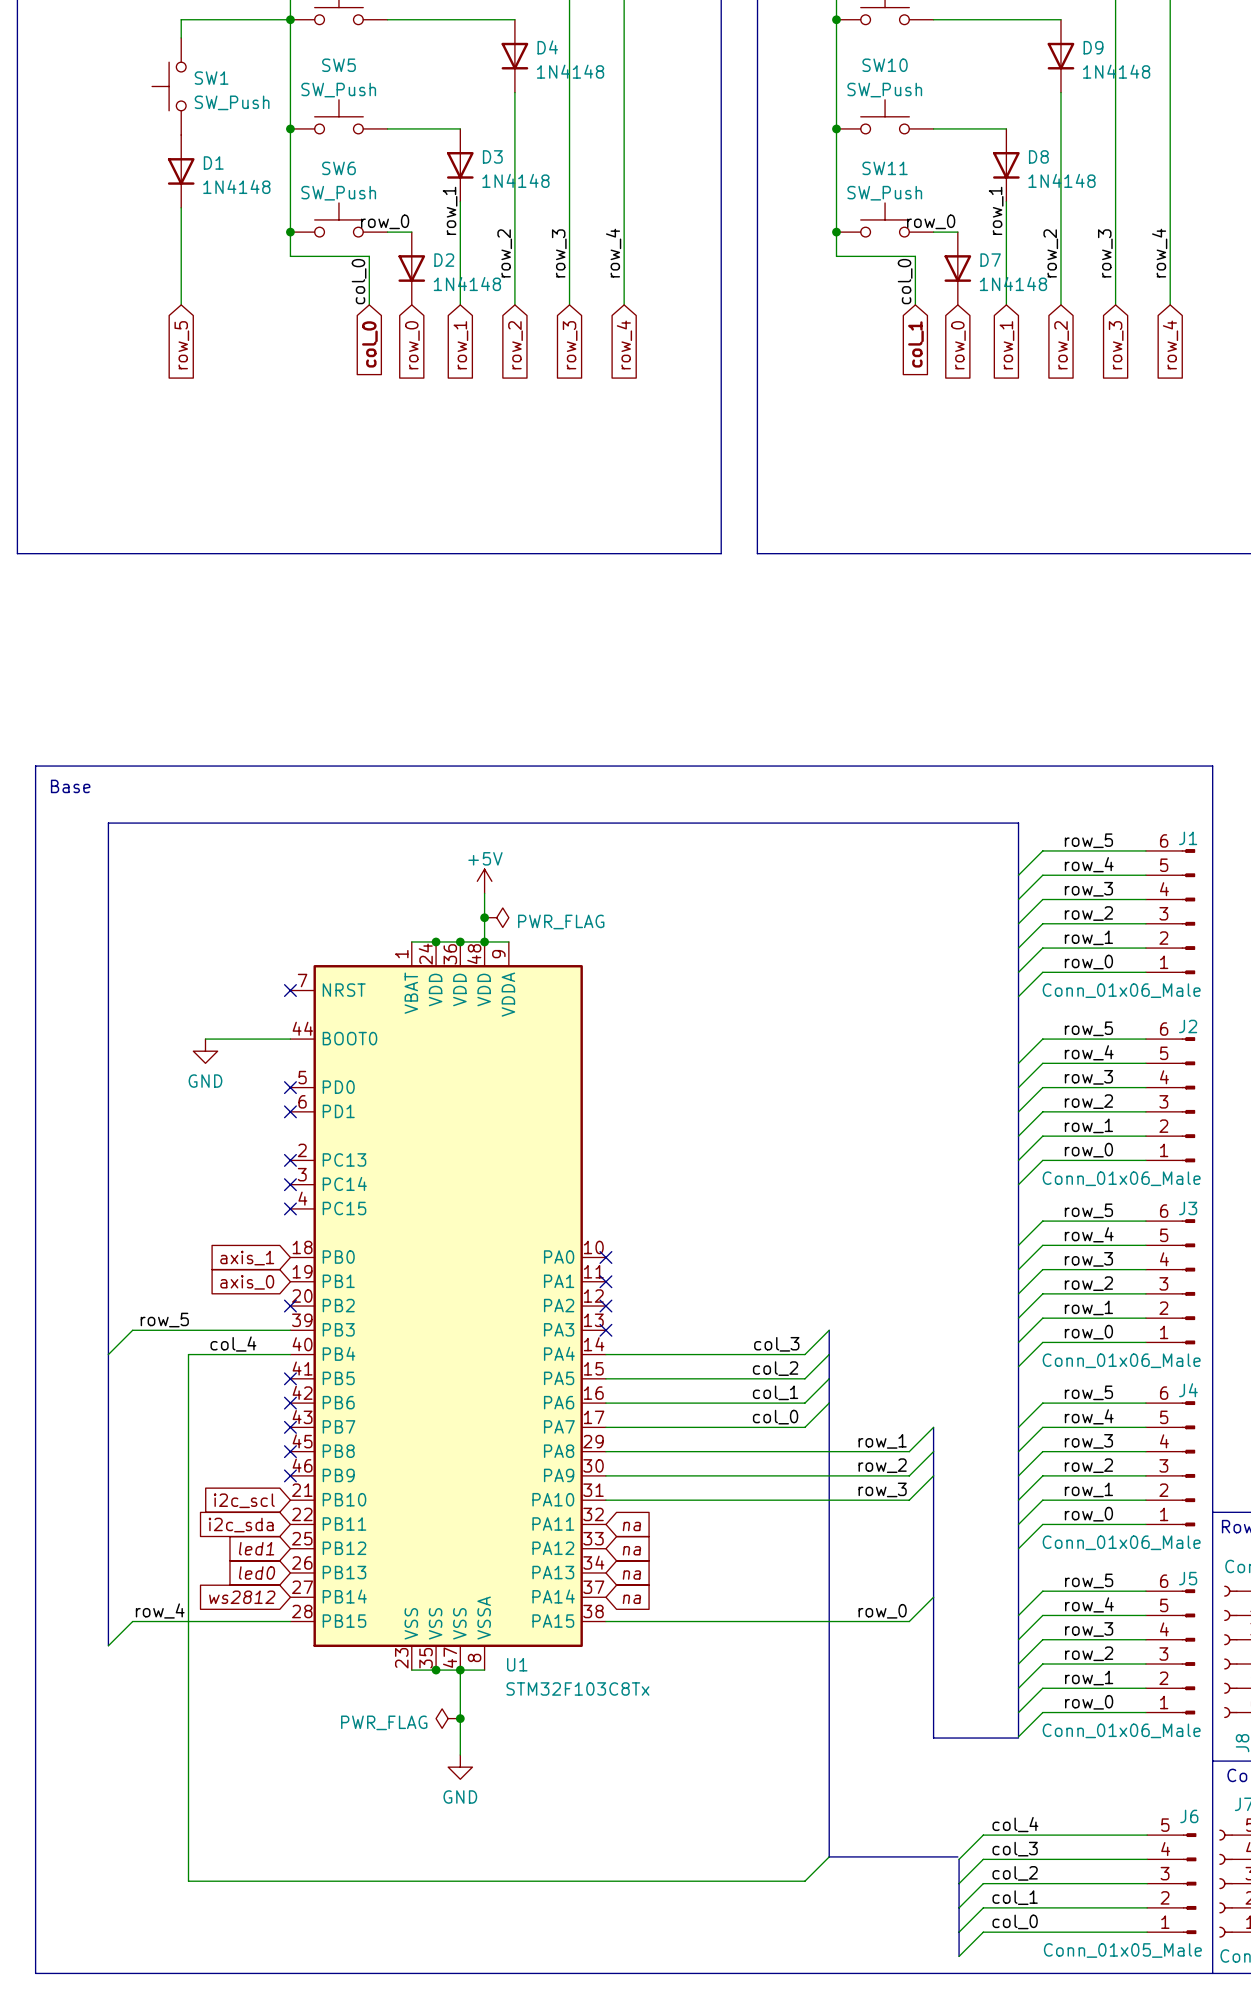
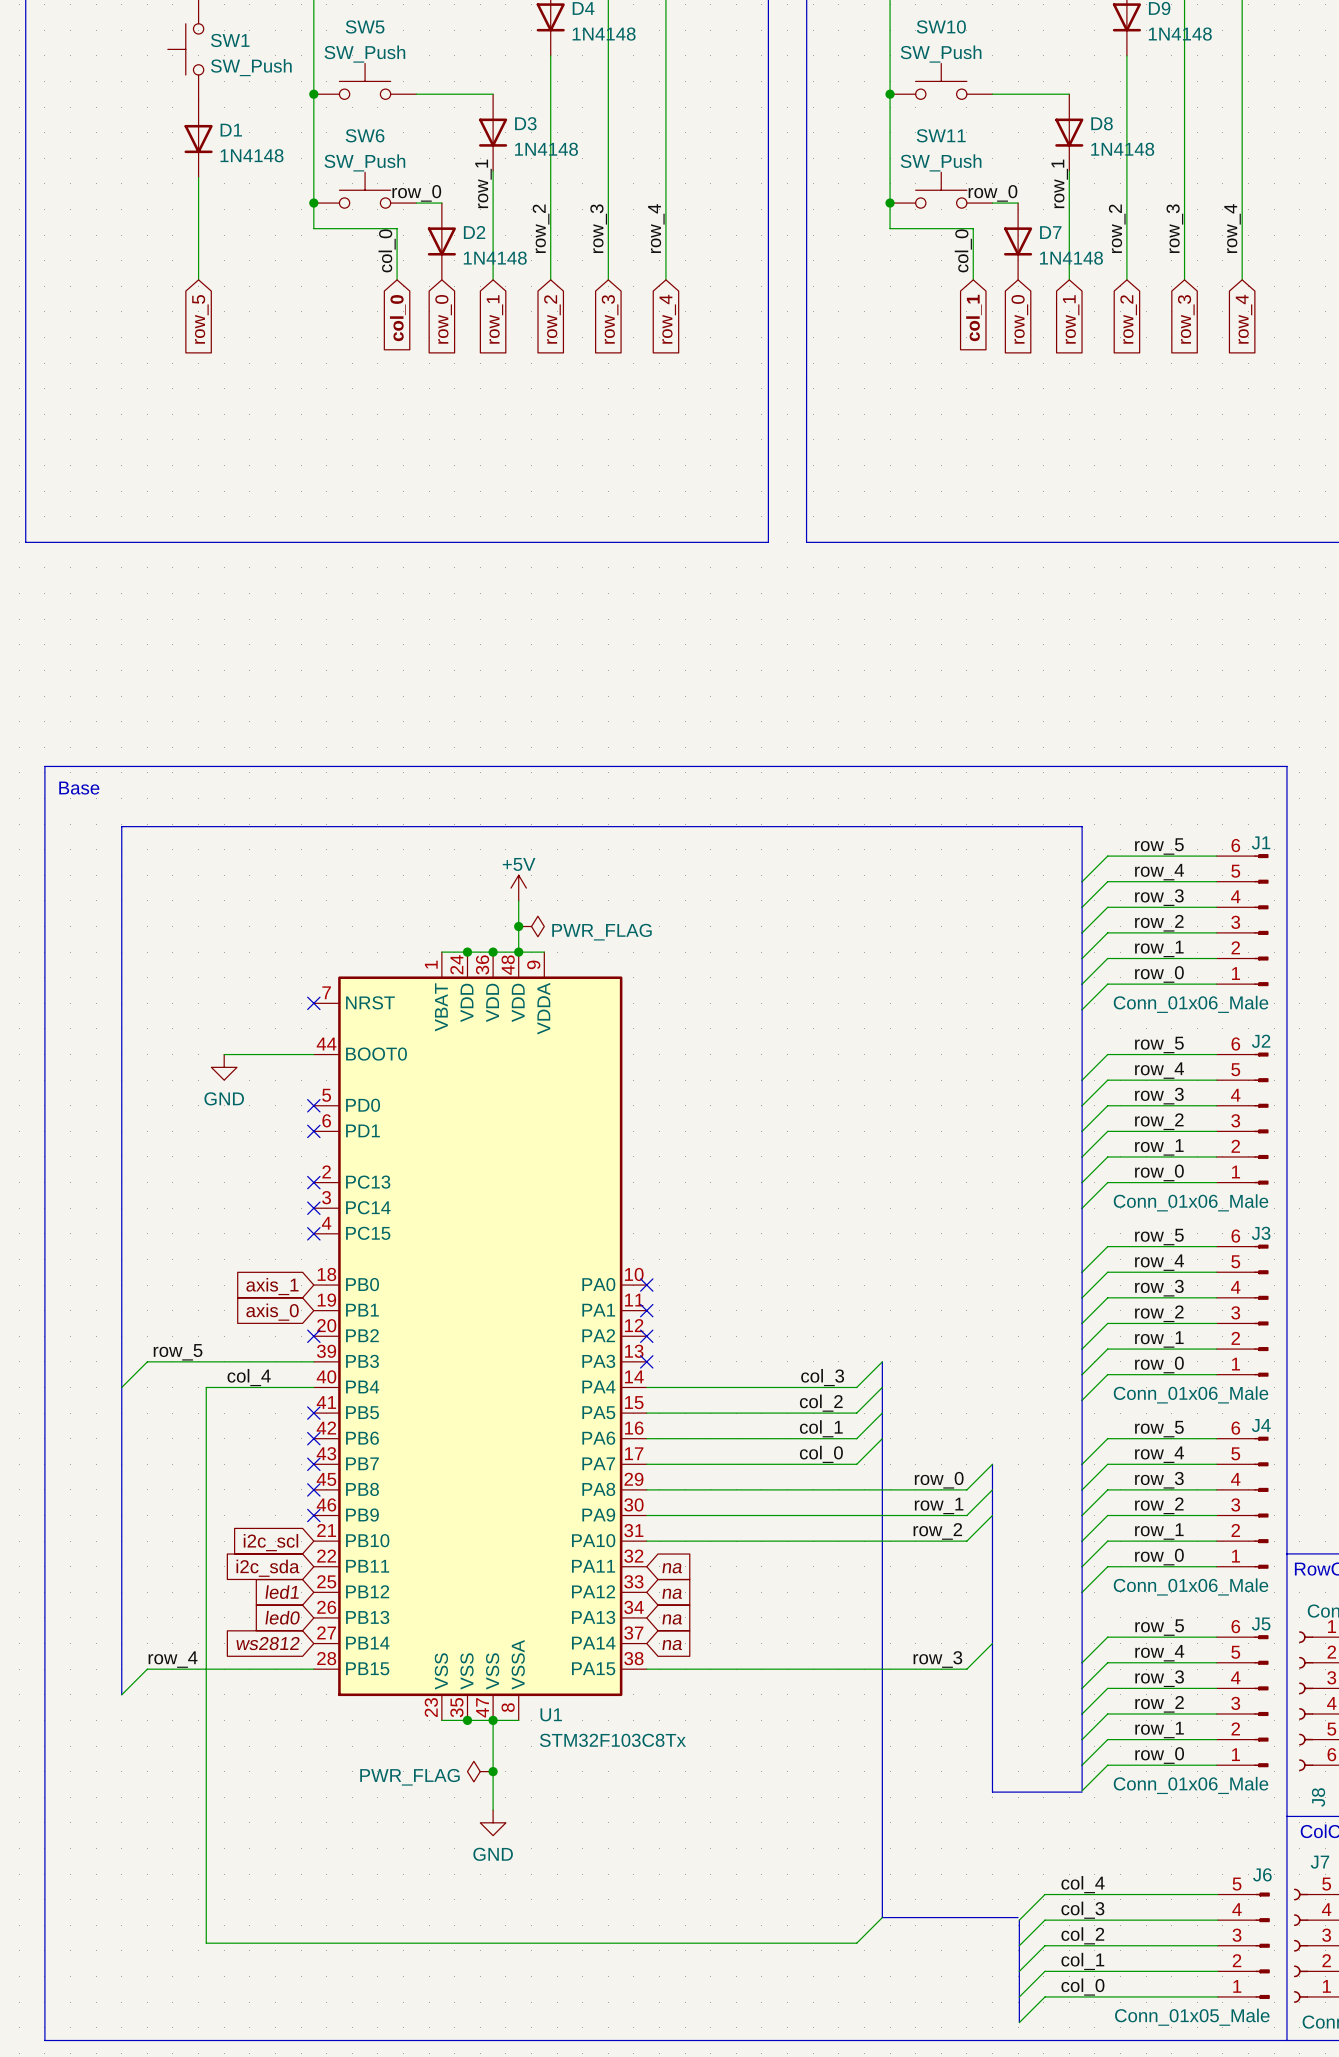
label: row_1 (882, 1441) -> row_0 (939, 1480)
label: row_2 (882, 1465) -> row_1 (939, 1505)
label: row_3 (882, 1489) -> row_2 (937, 1531)
label: row_0 (882, 1611) -> row_3 (937, 1659)

